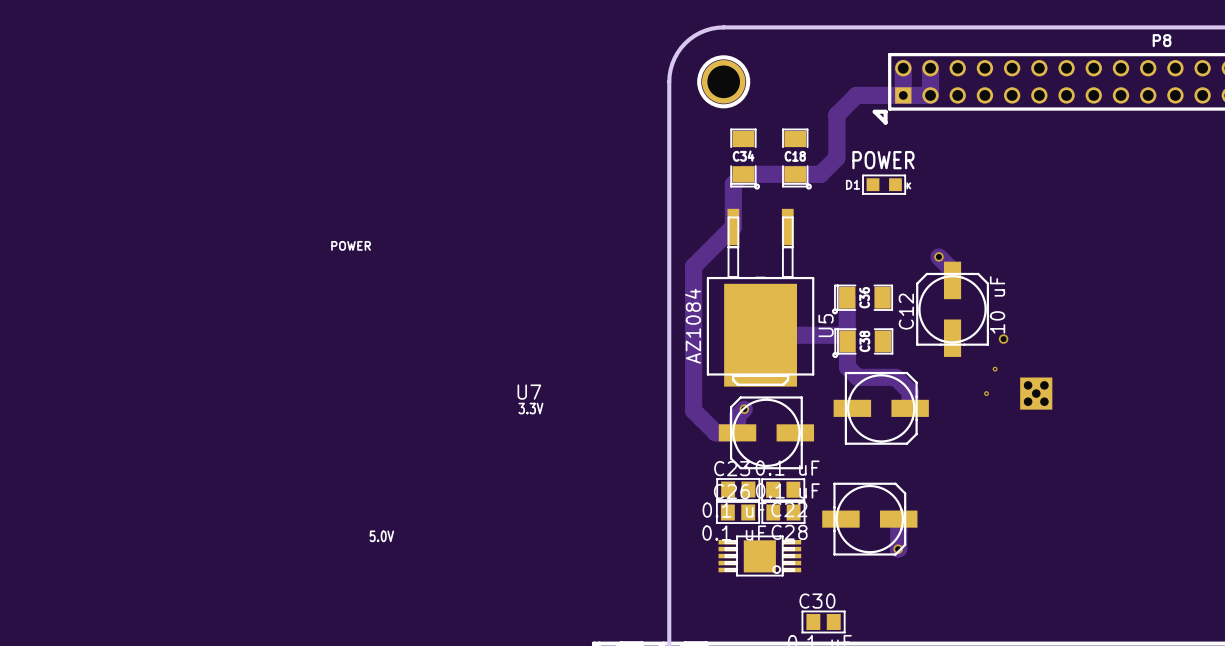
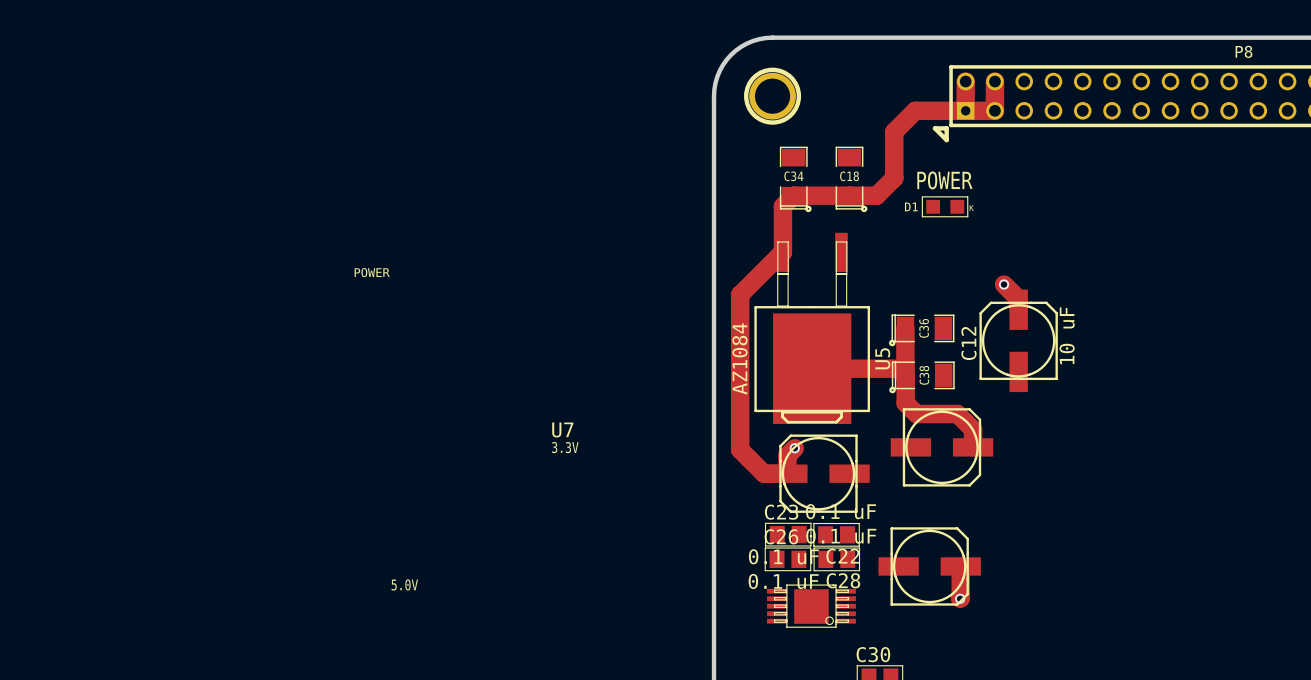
via: (1003, 339) -> none
via: (995, 369) -> none
via: (986, 393) -> none
part: (1036, 393) -> none

